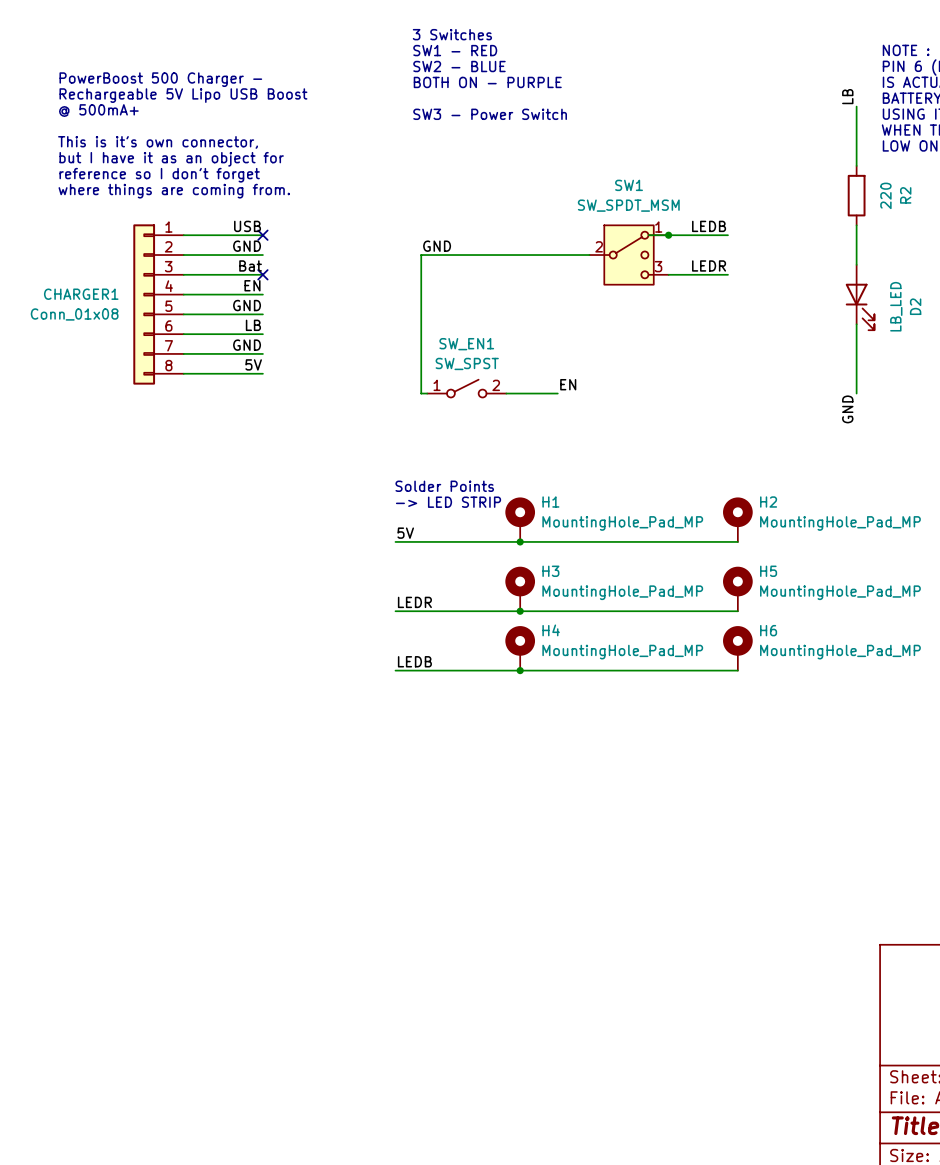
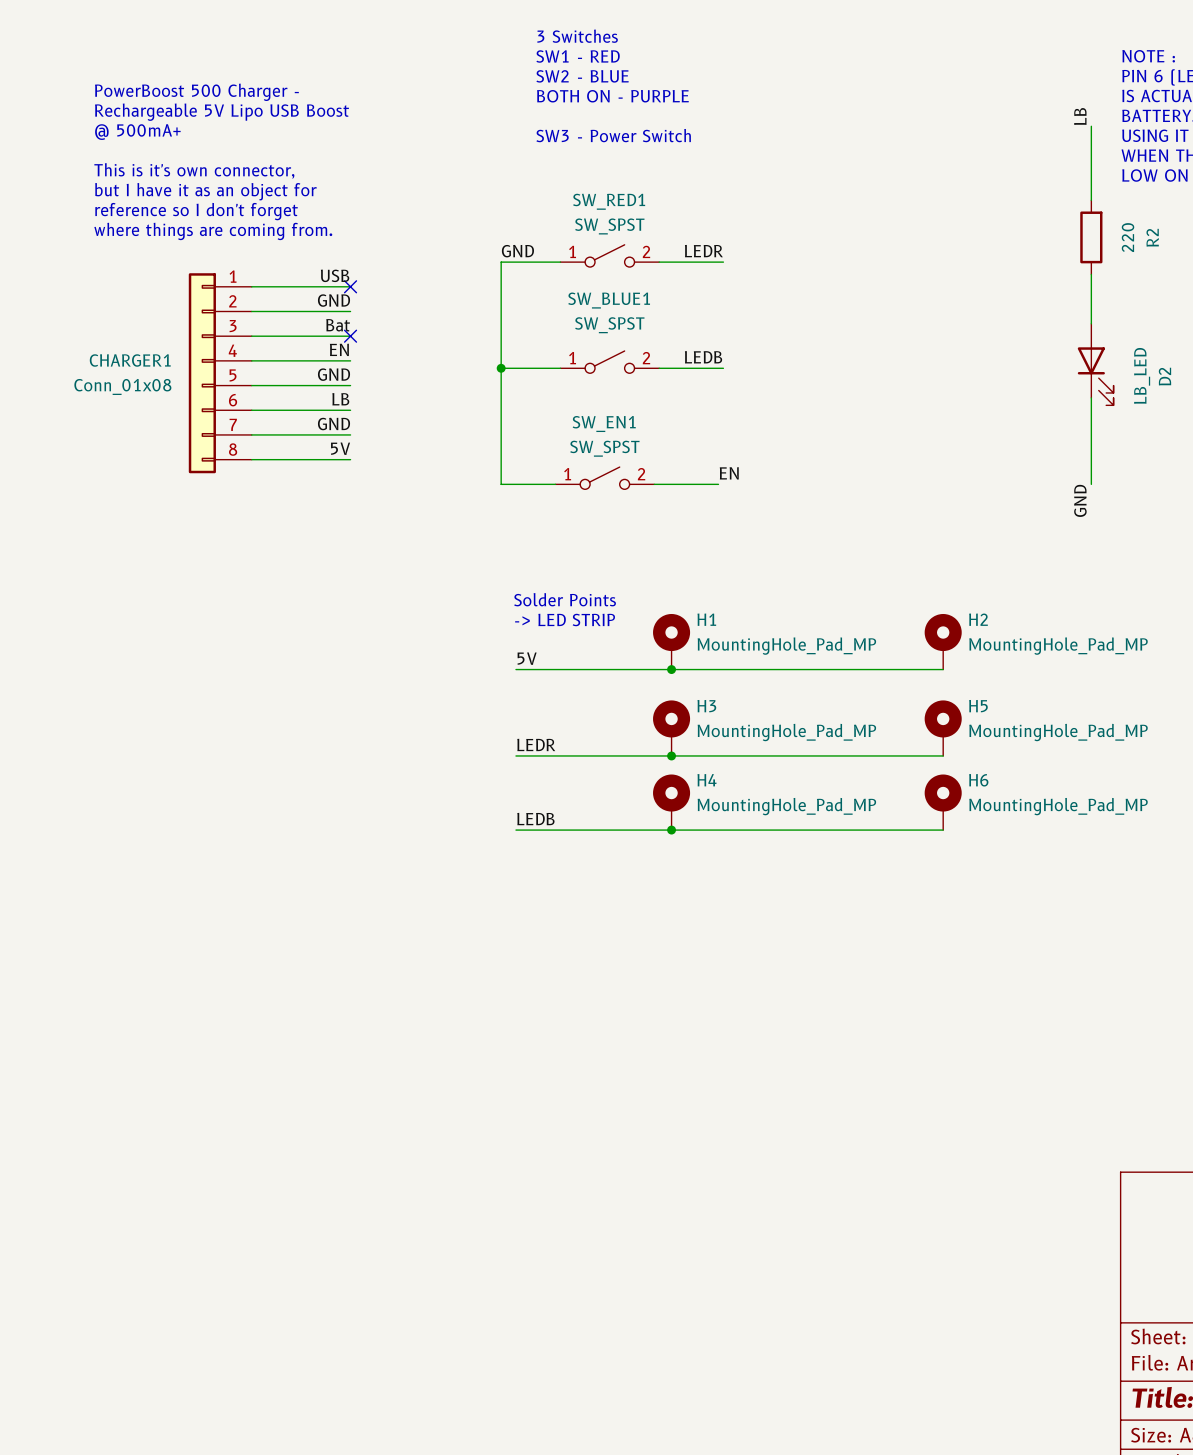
SW_RED1: none -> SW_SPST (609, 255)
wire: none -> (659, 262) (723, 262)
label position: LEDB (709, 226) -> LEDB (703, 357)
wire: (648, 235) (727, 235) -> none
junction: (668, 235) -> none
label position: GND (437, 246) -> GND (517, 251)
wire: (589, 255) (421, 255) (421, 393) -> (560, 262) (501, 262) (501, 484) (548, 484)
SW1: SW_SPDT_MSM (629, 255) -> none
label position: LEDR (709, 265) -> LEDR (703, 251)
wire: (668, 274) (727, 274) -> none
SW_BLUE1: none -> SW_SPST (609, 362)
wire: none -> (501, 368) (560, 368)
junction: none -> (501, 368)
wire: none -> (659, 368) (723, 368)

